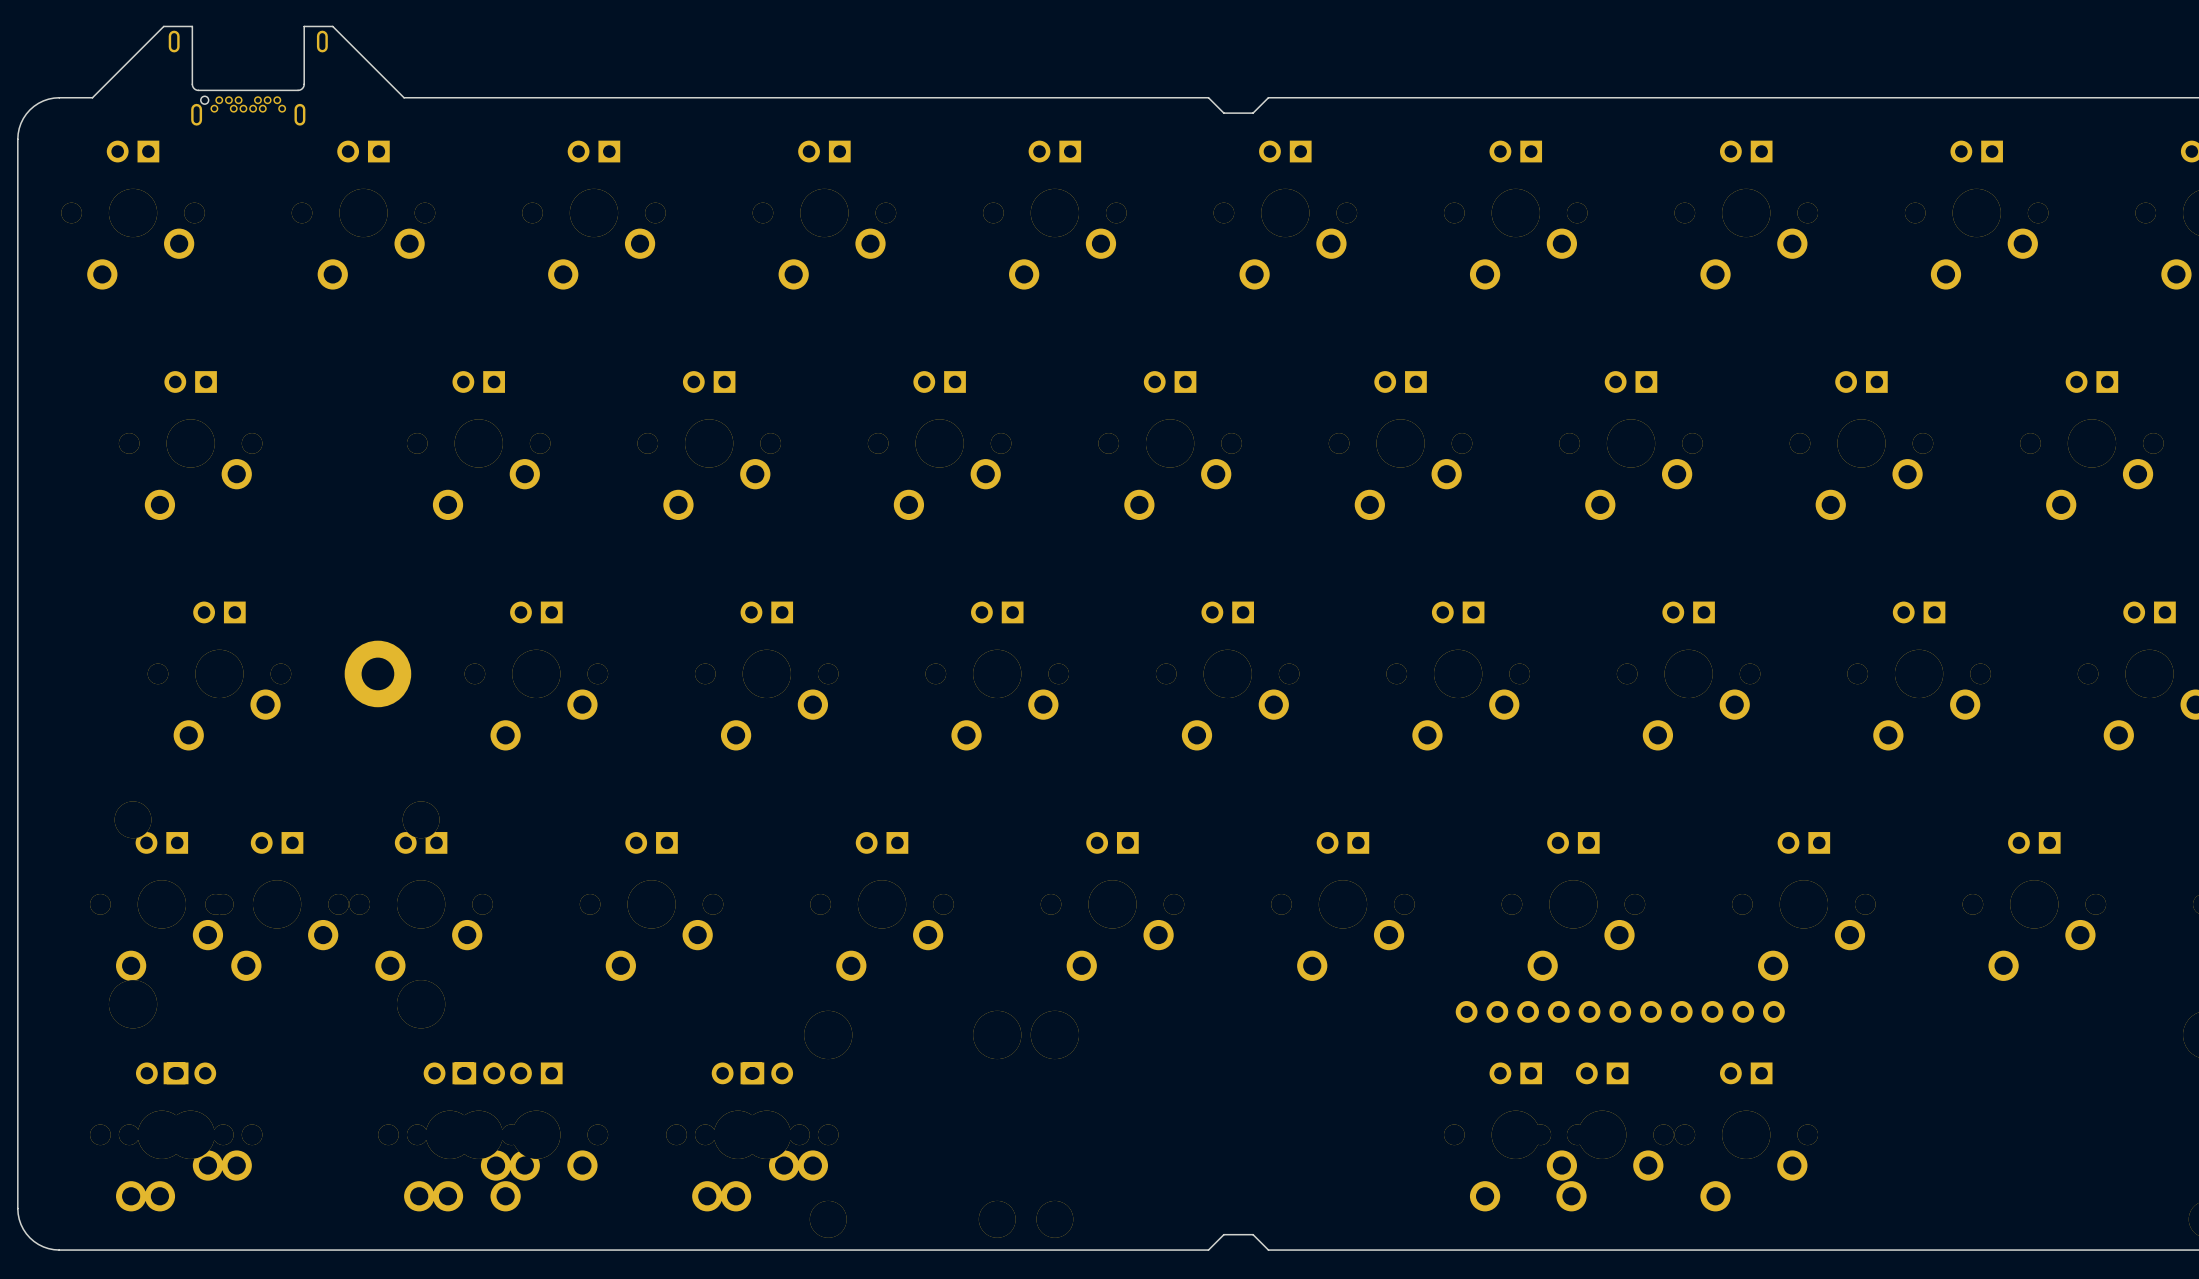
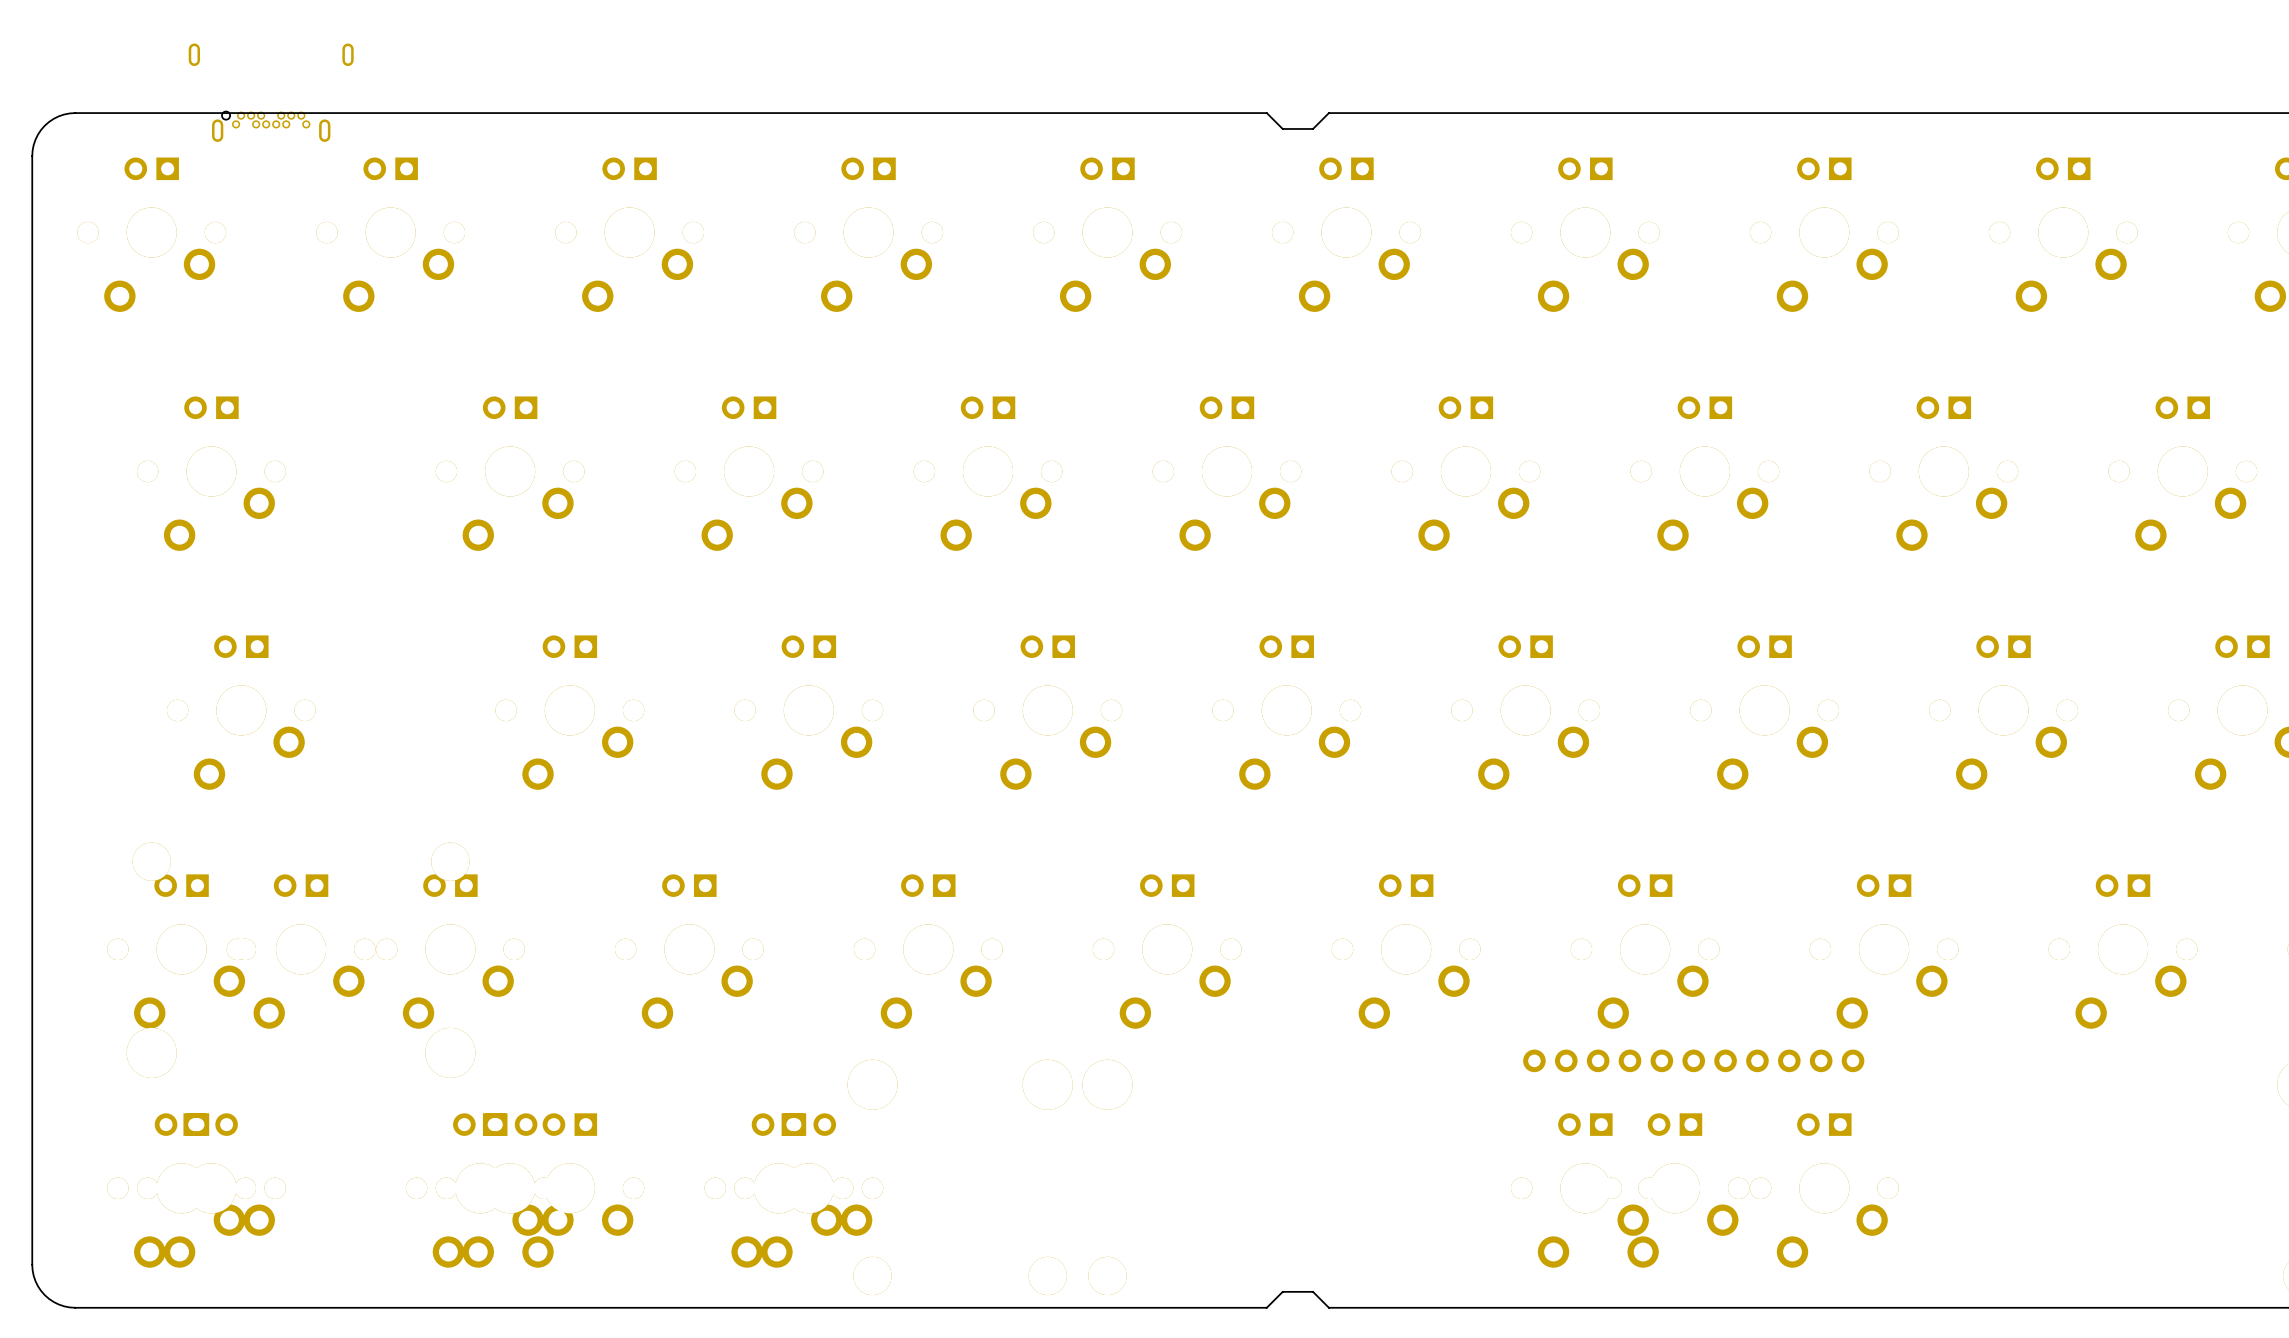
board edge: (92, 97) (163, 26) (192, 26) (192, 85) (196, 90) (300, 89) (304, 84) (304, 26) (332, 26) (404, 97) -> (109, 113) (432, 113)
part: (377, 673) -> none

